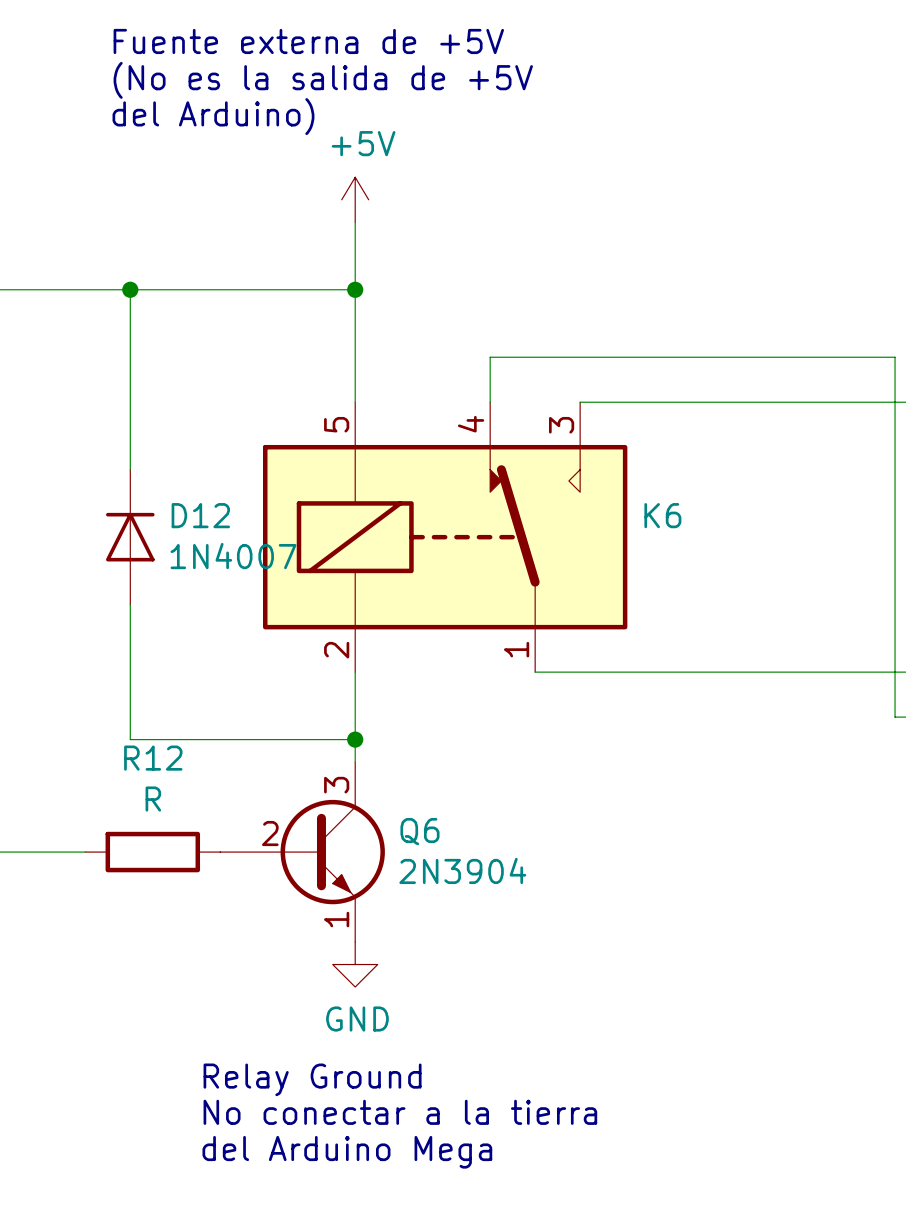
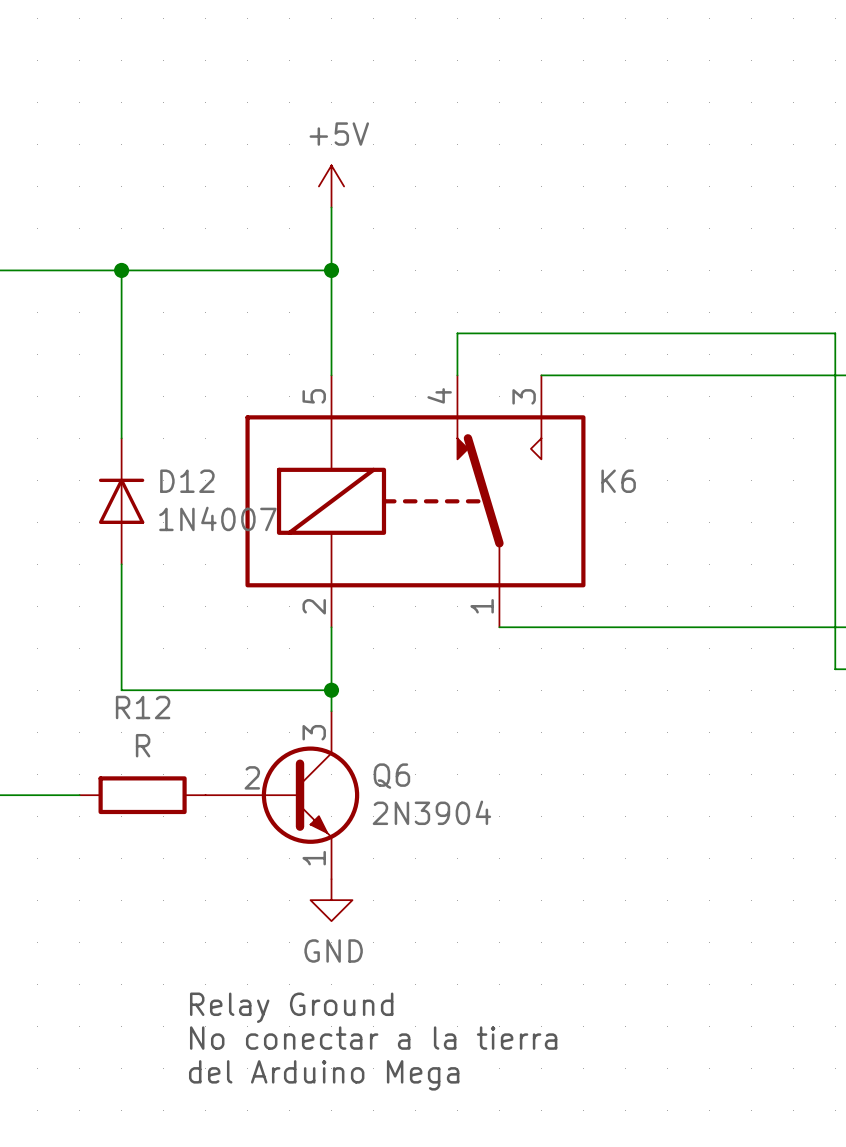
text: Fuente externa de +5V (308, 41) -> none
text: (No es la salida de +5V (323, 80) -> none
text: del Arduino) (213, 116) -> none

